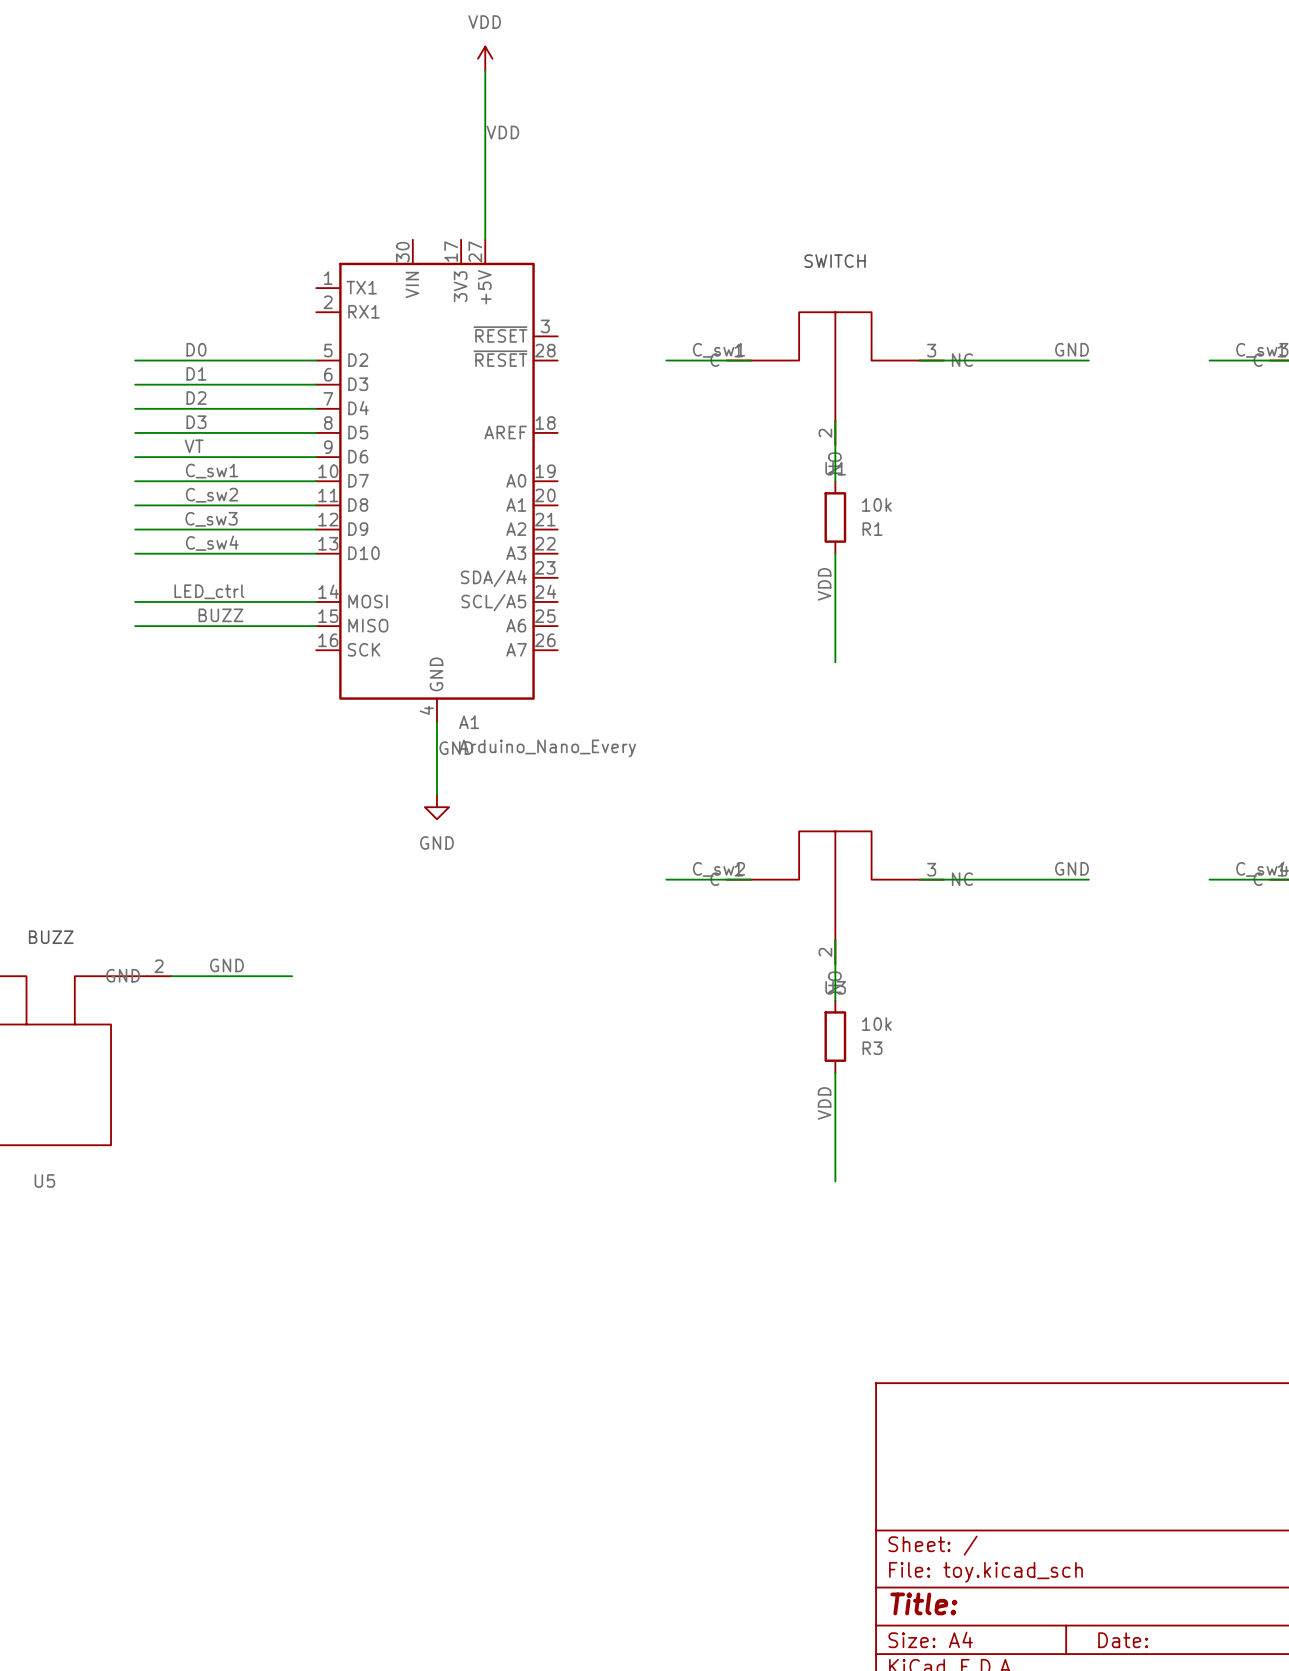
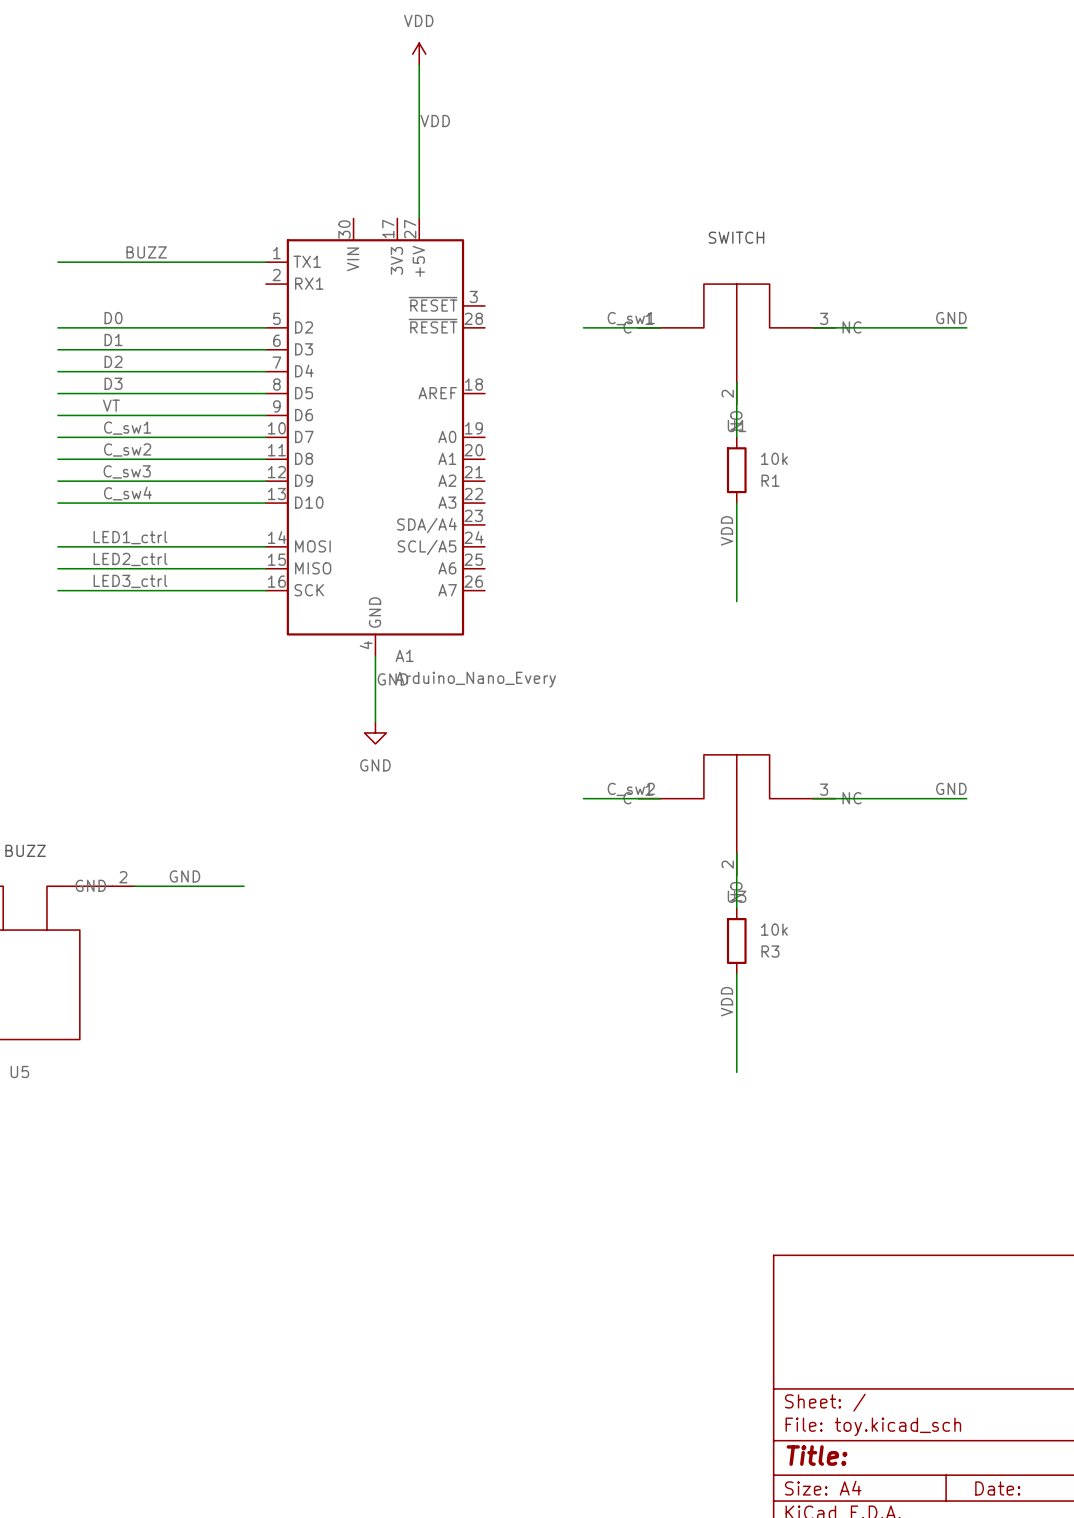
label: none -> BUZZ (146, 252)
wire: none -> (57, 262) (265, 262)
label position: D0 (196, 349) -> D0 (113, 318)
wire: none -> (57, 327) (101, 327)
label position: D1 (196, 373) -> D1 (113, 339)
wire: none -> (57, 349) (101, 349)
label position: D2 (196, 398) -> D2 (113, 361)
wire: none -> (57, 371) (101, 371)
label position: D3 (196, 422) -> D3 (113, 383)
wire: none -> (57, 393) (101, 393)
label position: VT (194, 446) -> VT (111, 405)
wire: none -> (57, 415) (101, 415)
label position: C_sw1 (212, 471) -> C_sw1 (127, 428)
wire: none -> (57, 437) (101, 437)
label position: C_sw2 (212, 495) -> C_sw2 (127, 450)
wire: none -> (57, 459) (101, 459)
label position: C_sw3 (211, 519) -> C_sw3 (127, 471)
wire: none -> (57, 481) (101, 481)
label position: C_sw4 (212, 543) -> C_sw4 (127, 493)
wire: none -> (57, 503) (101, 503)
label: none -> LED1_ctrl (130, 537)
label: LED_ctrl (209, 591) -> none
wire: none -> (57, 546) (101, 546)
label: none -> LED2_ctrl (130, 559)
label: BUZZ (220, 615) -> none
wire: none -> (57, 568) (101, 568)
label: none -> LED3_ctrl (130, 581)
wire: none -> (57, 590) (265, 590)

